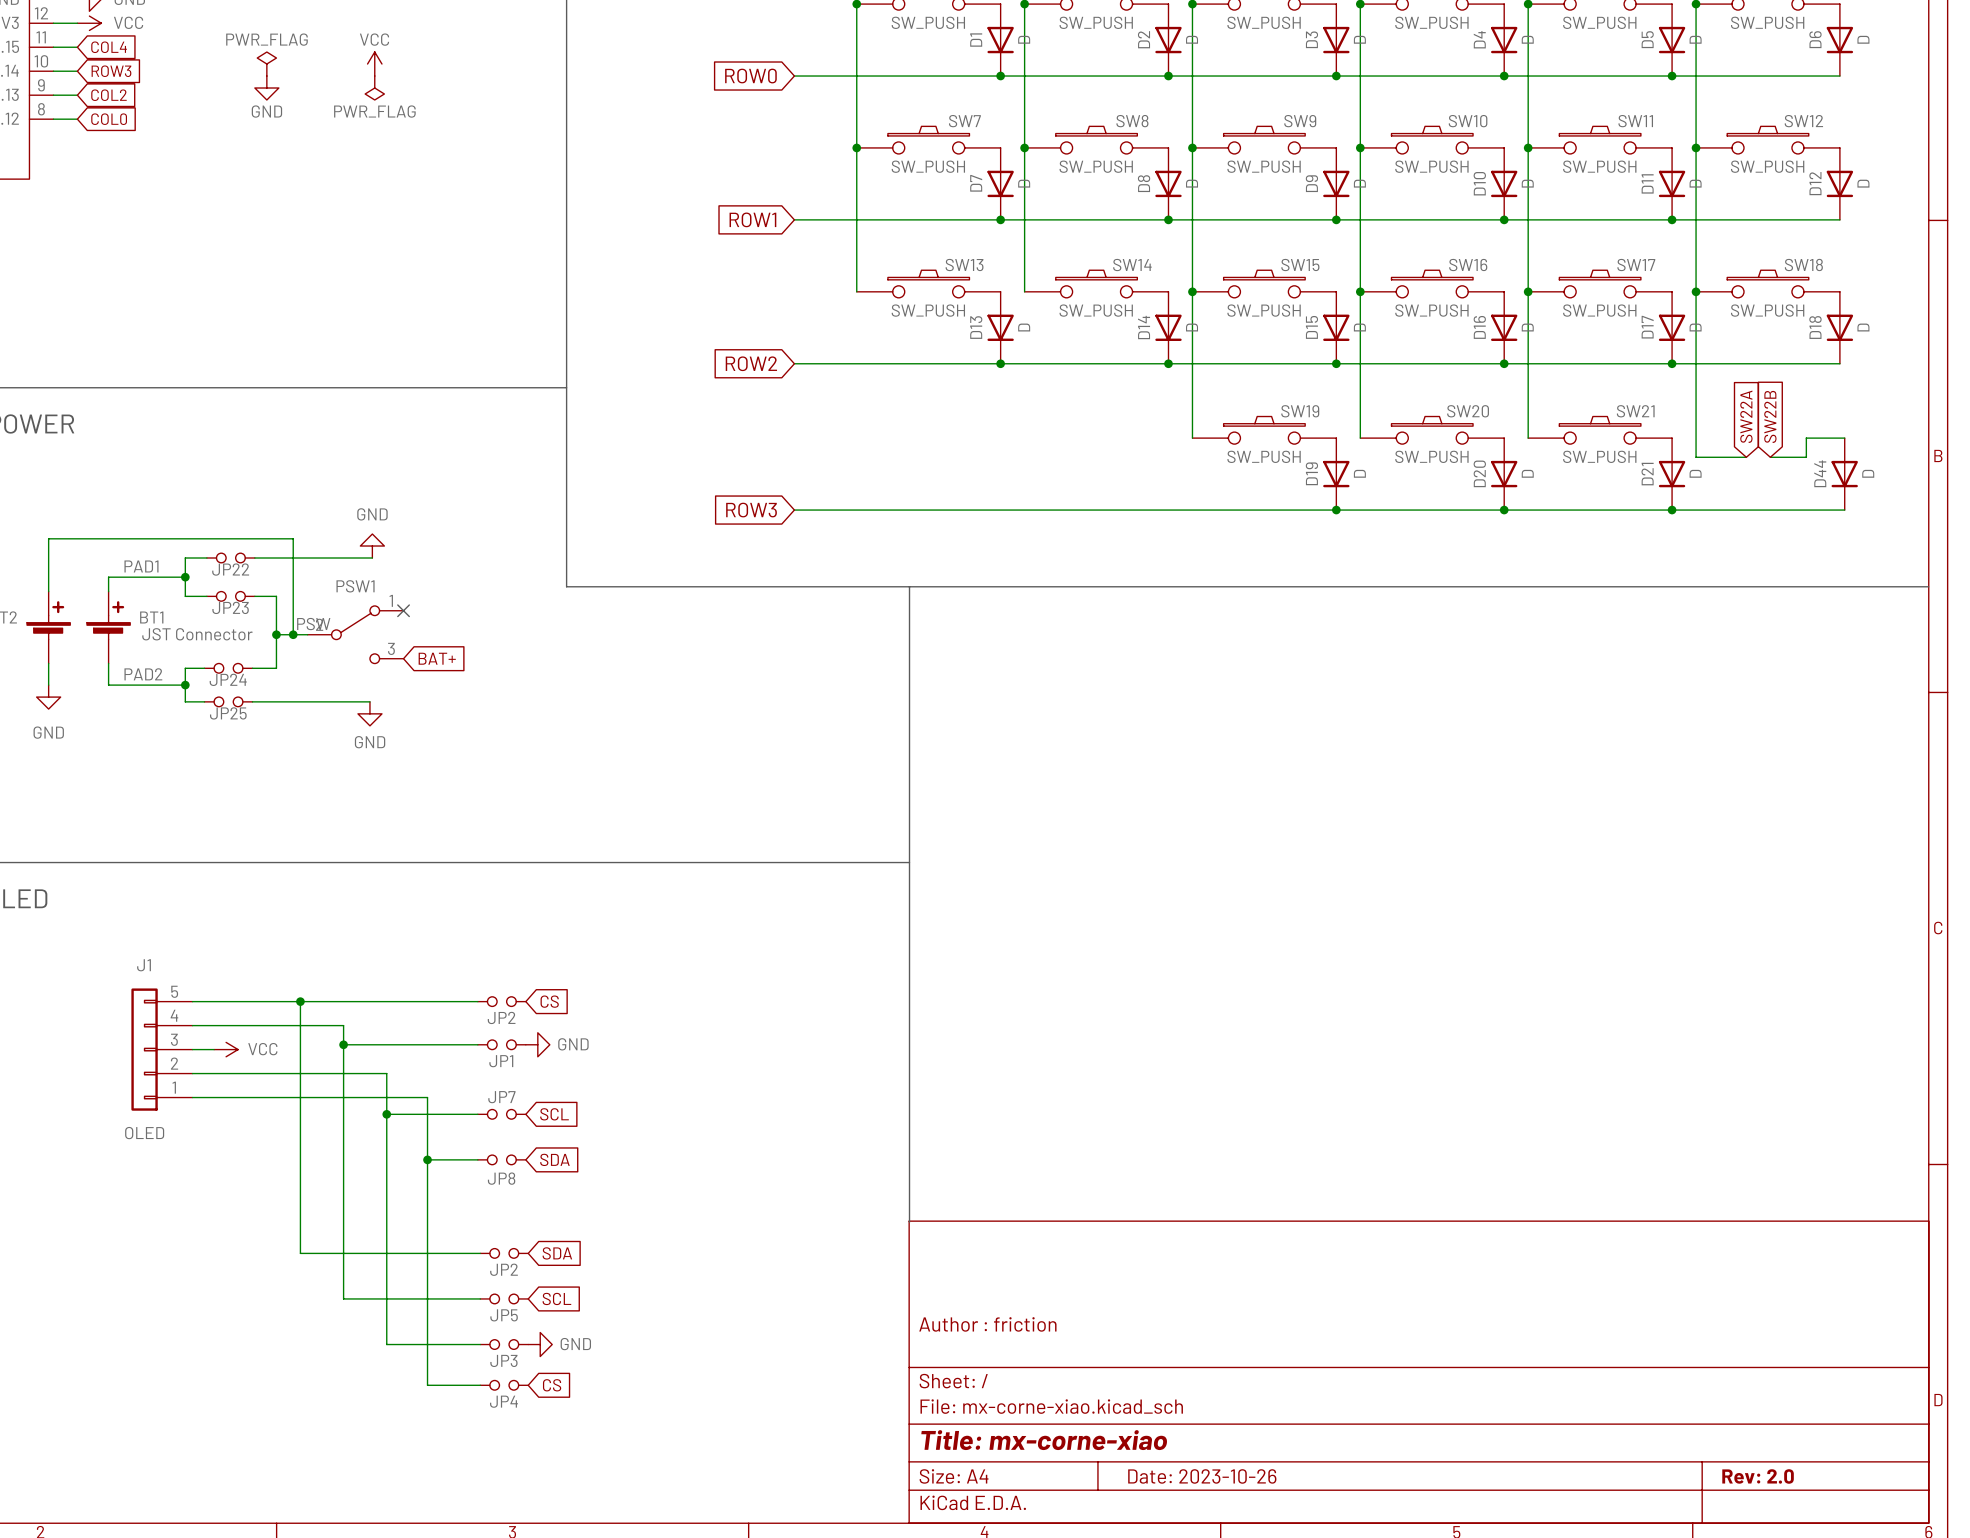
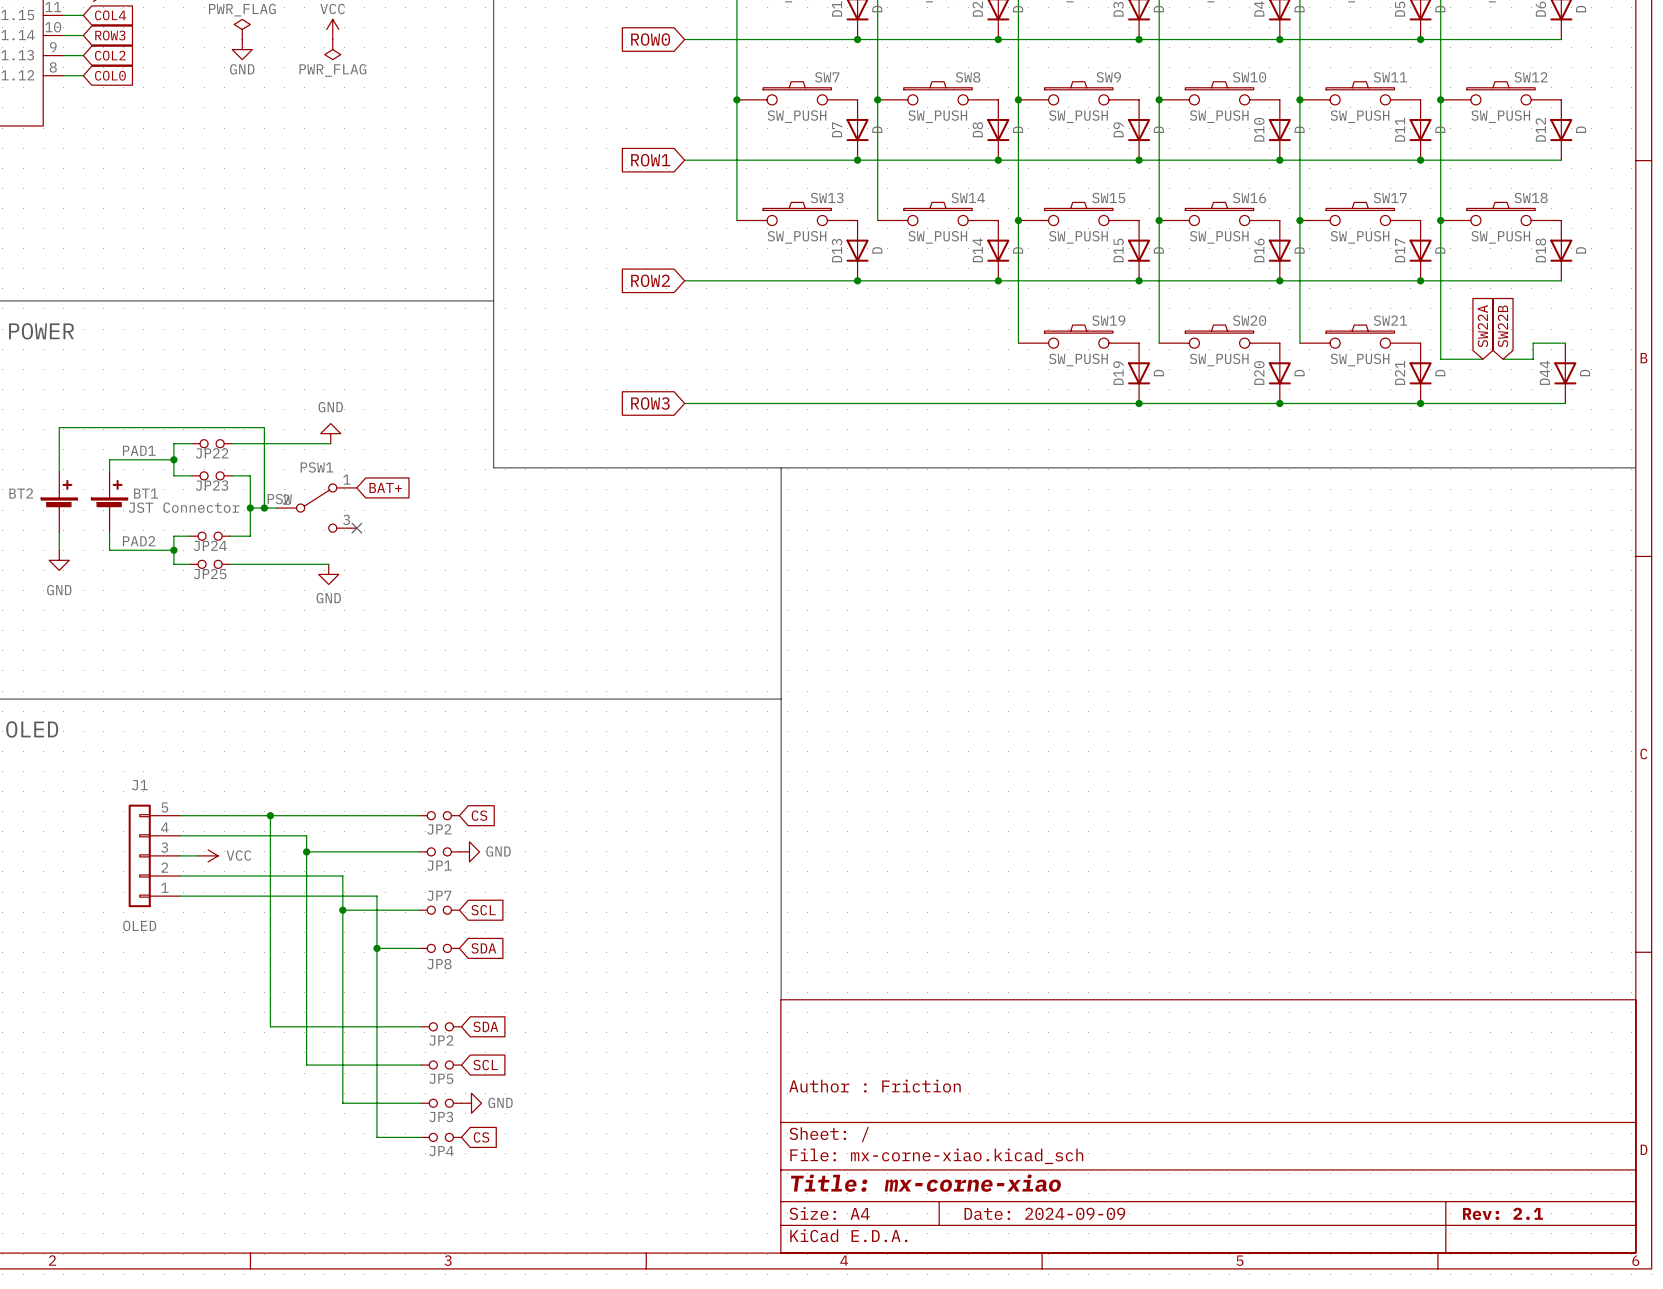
no-connect mark position: (403, 610) -> (356, 528)
global label position: BAT+ (437, 658) -> BAT+ (385, 487)
title block: Author : friction (987, 1324) -> Author : Friction (875, 1086)
title block: Date: 2023-10-26 (1202, 1476) -> Date: 2024-09-09 (1044, 1213)
title block: Rev: 2.0 (1758, 1476) -> Rev: 2.1 (1502, 1213)

